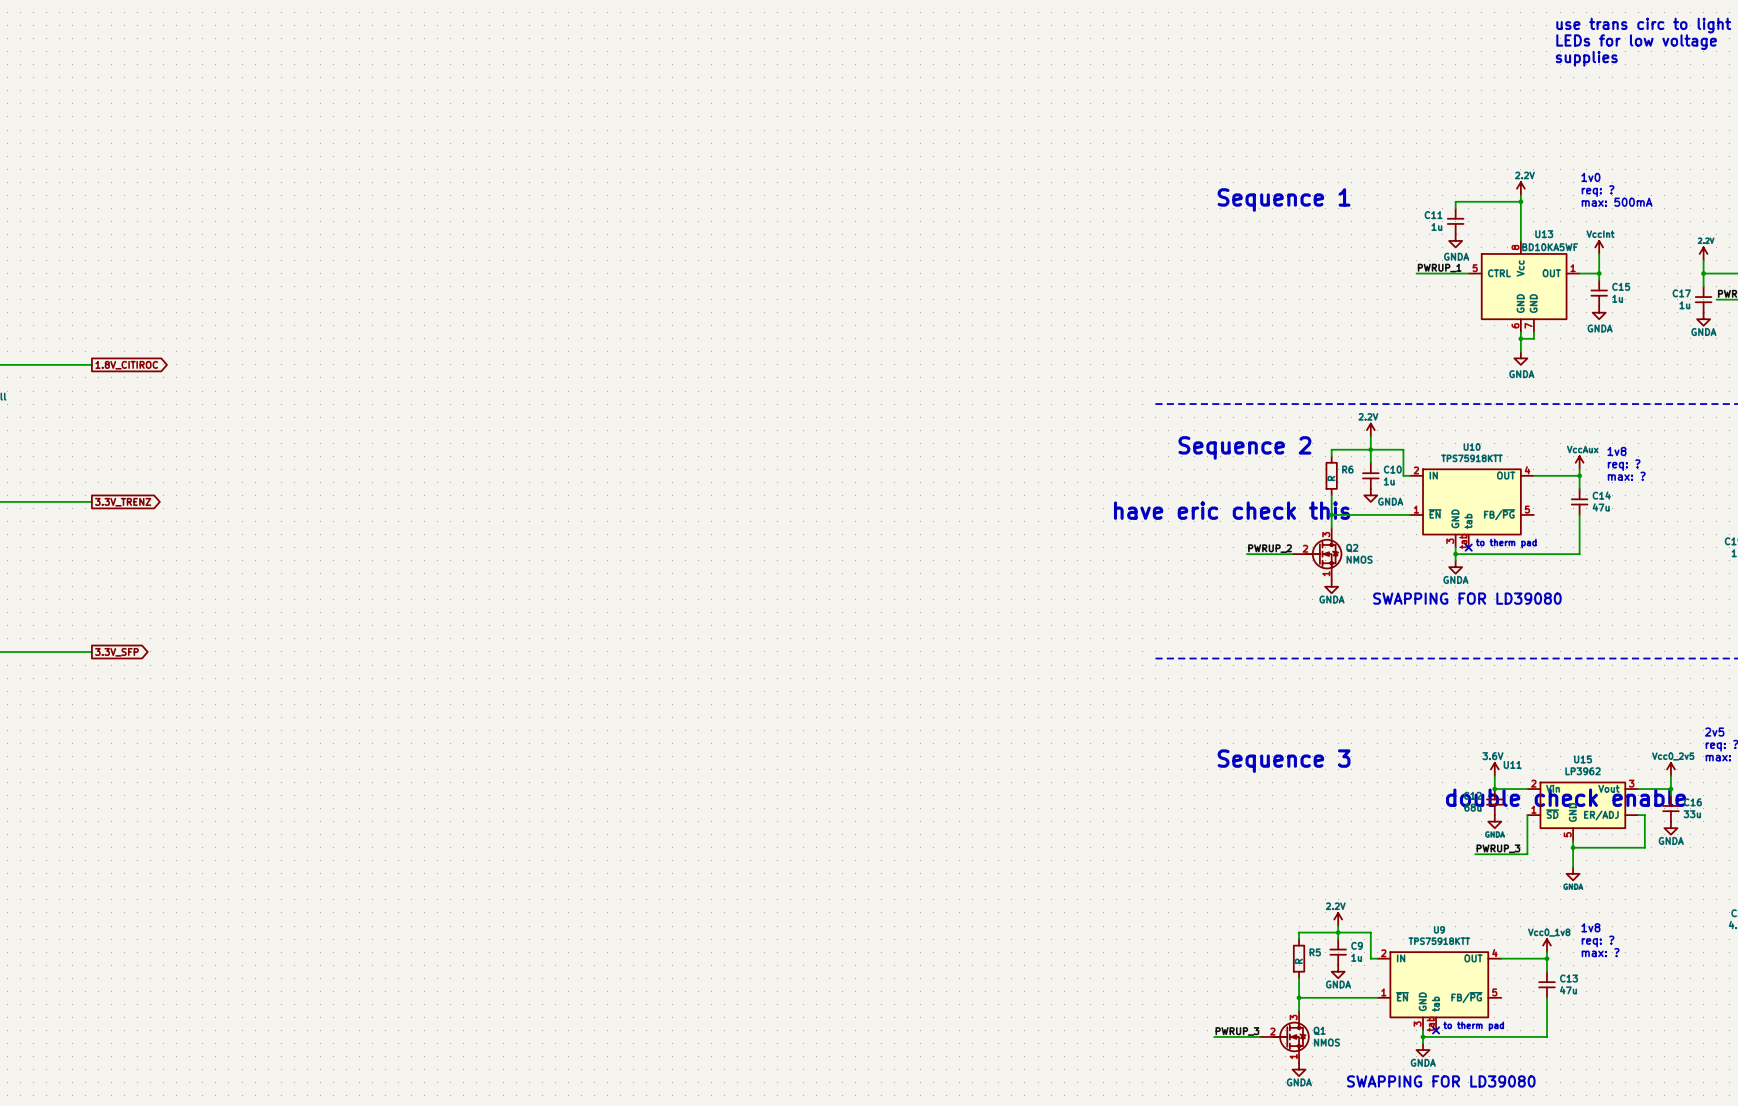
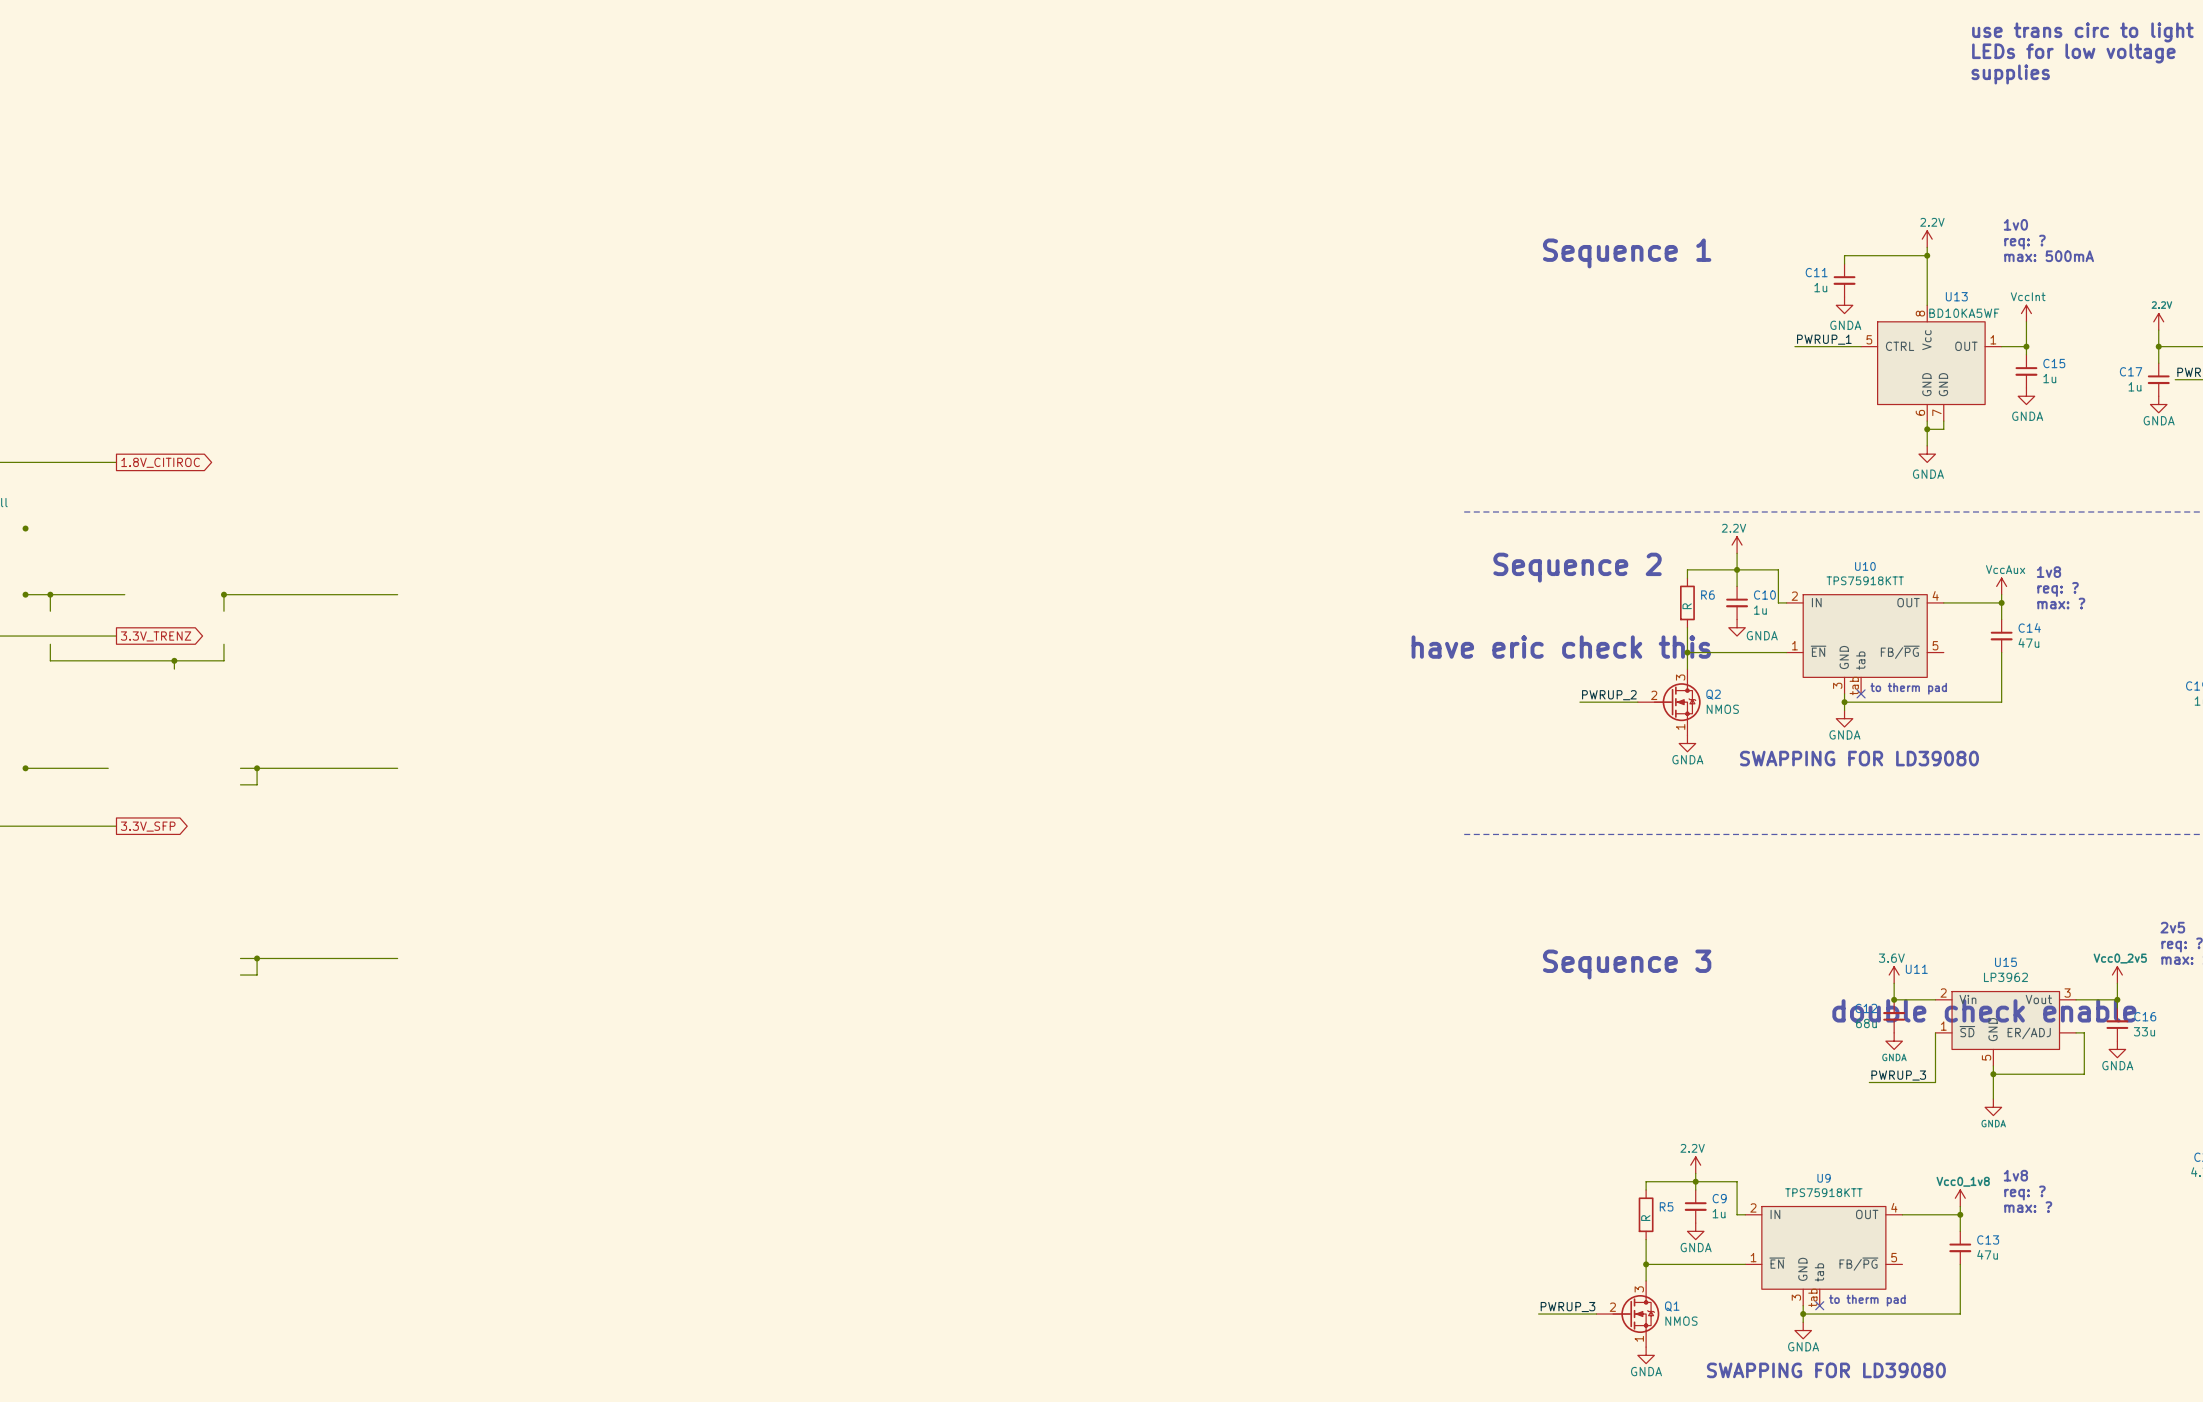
junction: none -> (25, 528)
wire: none -> (25, 594) (124, 594)
junction: none -> (25, 594)
wire: none -> (50, 594) (50, 611)
junction: none -> (50, 594)
junction: none -> (223, 594)
wire: none -> (397, 594) (223, 594) (223, 611)
wire: none -> (50, 644) (50, 660) (223, 660) (223, 644)
wire: none -> (174, 660) (174, 669)
junction: none -> (174, 660)
wire: none -> (25, 768) (108, 768)
junction: none -> (25, 768)
wire: none -> (240, 768) (397, 768)
wire: none -> (257, 768) (257, 784) (240, 784)
junction: none -> (257, 768)
wire: none -> (240, 958) (397, 958)
wire: none -> (257, 958) (257, 975) (240, 975)
junction: none -> (257, 958)

